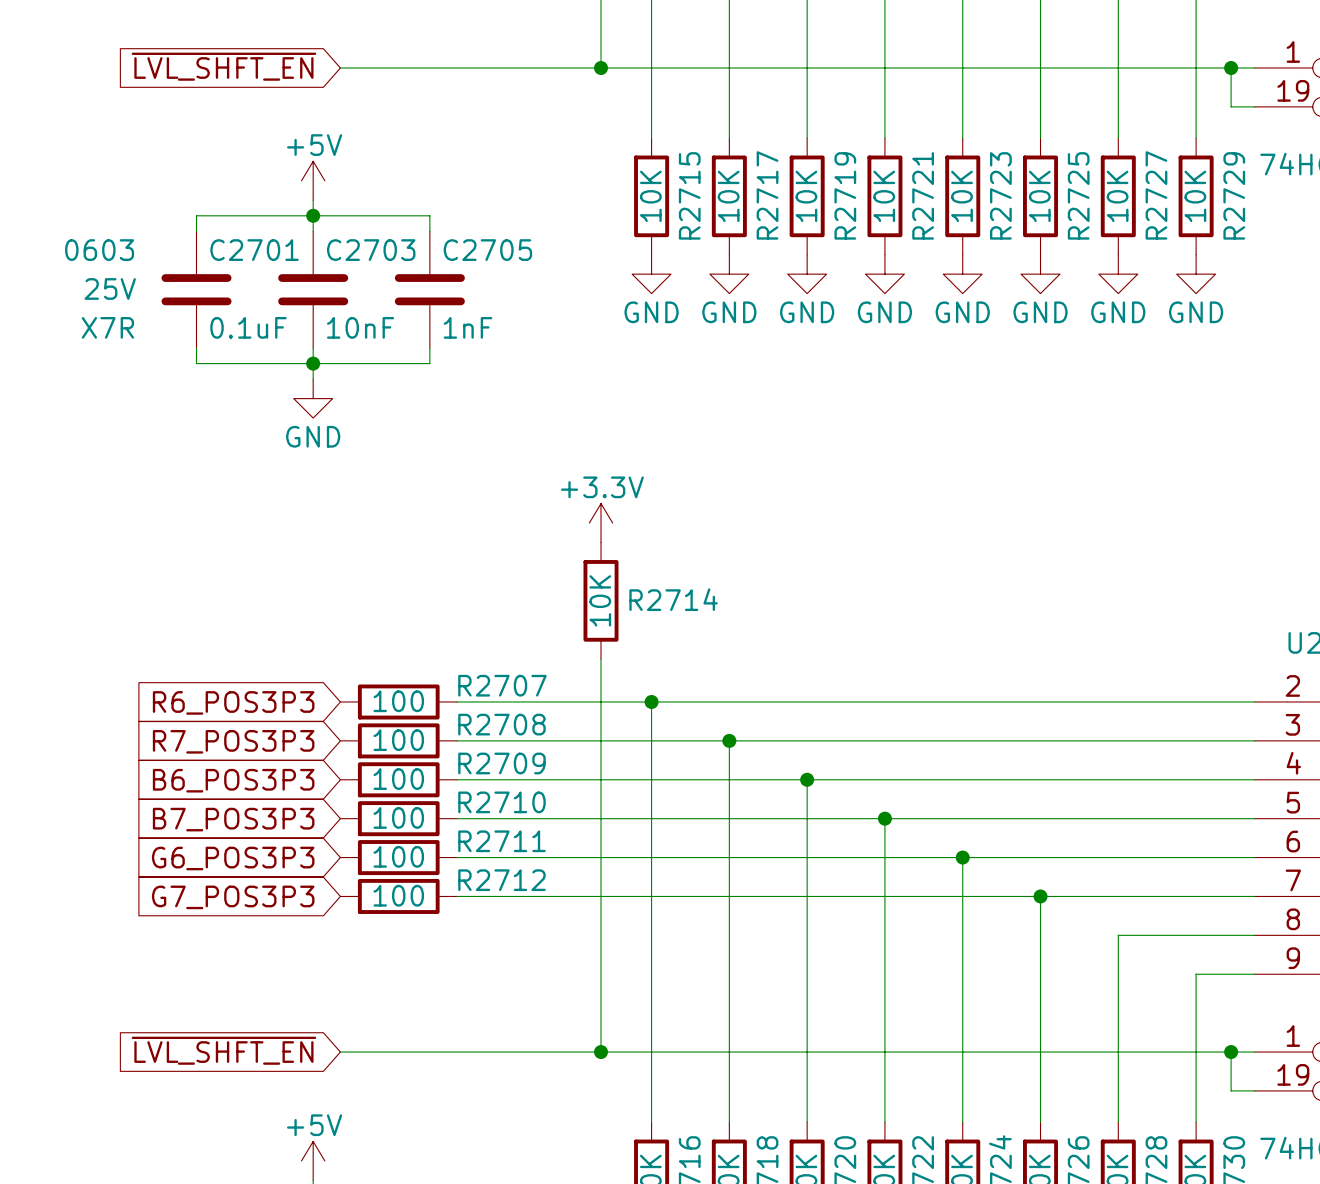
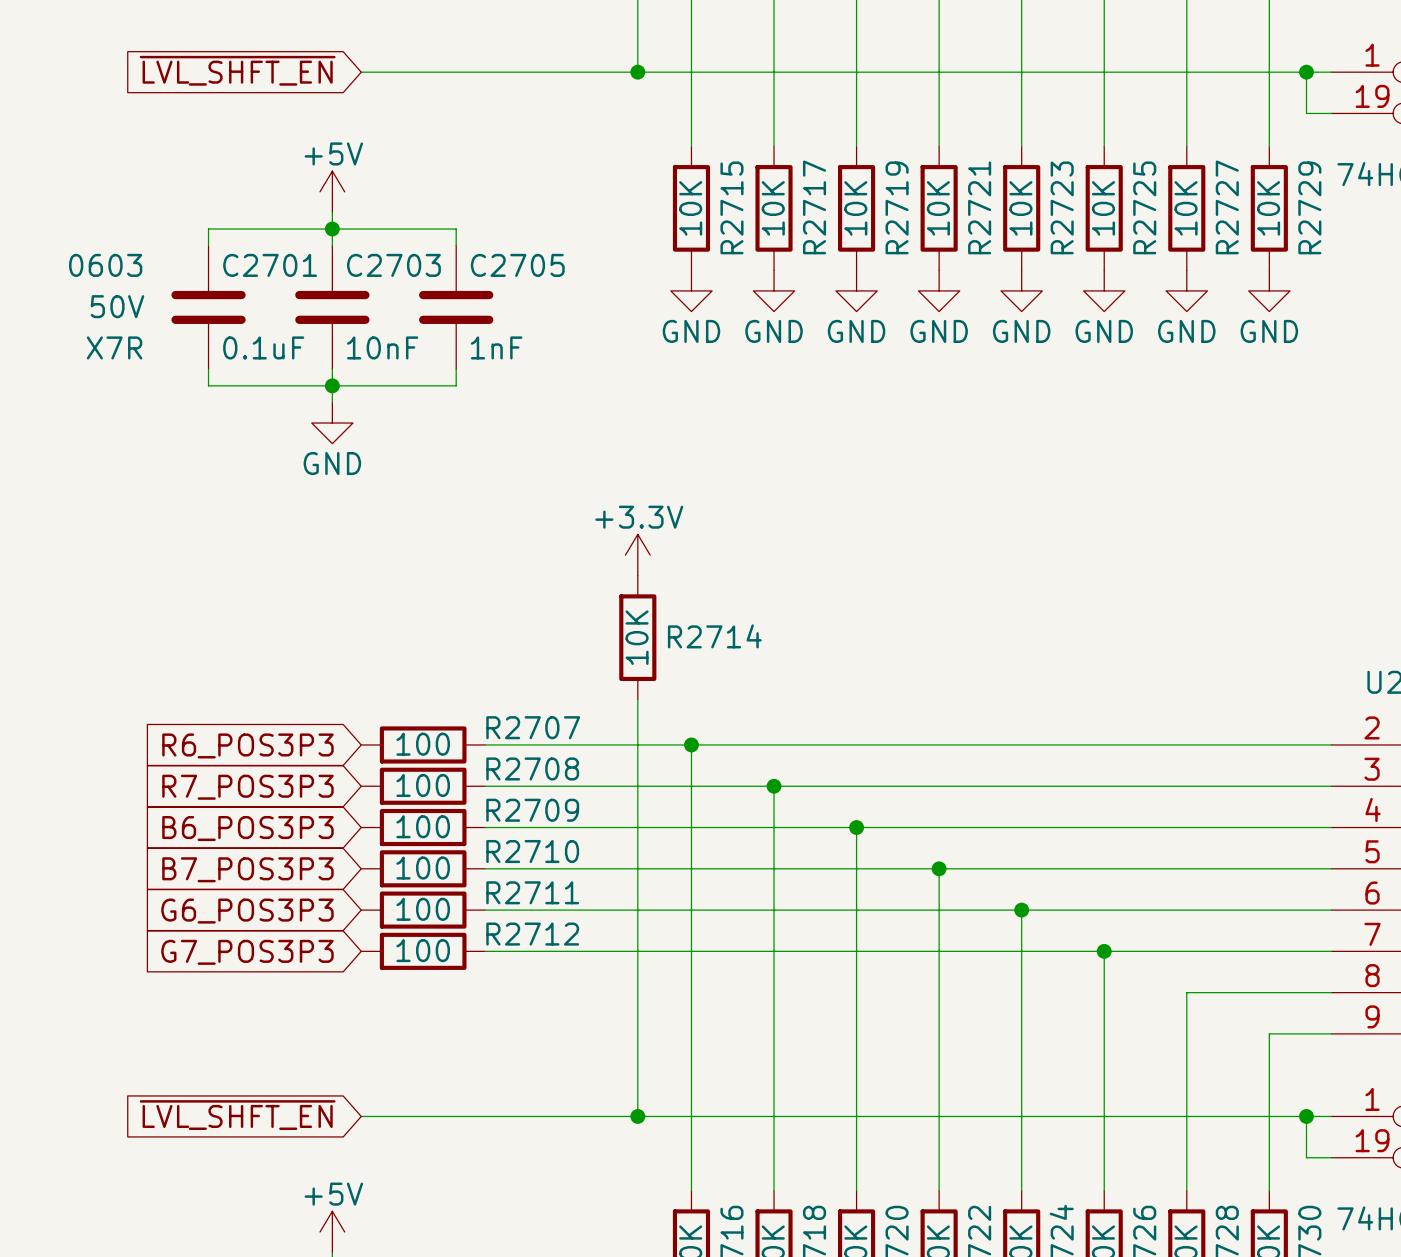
C2701 text: 25V (110, 288) -> 50V (117, 306)

